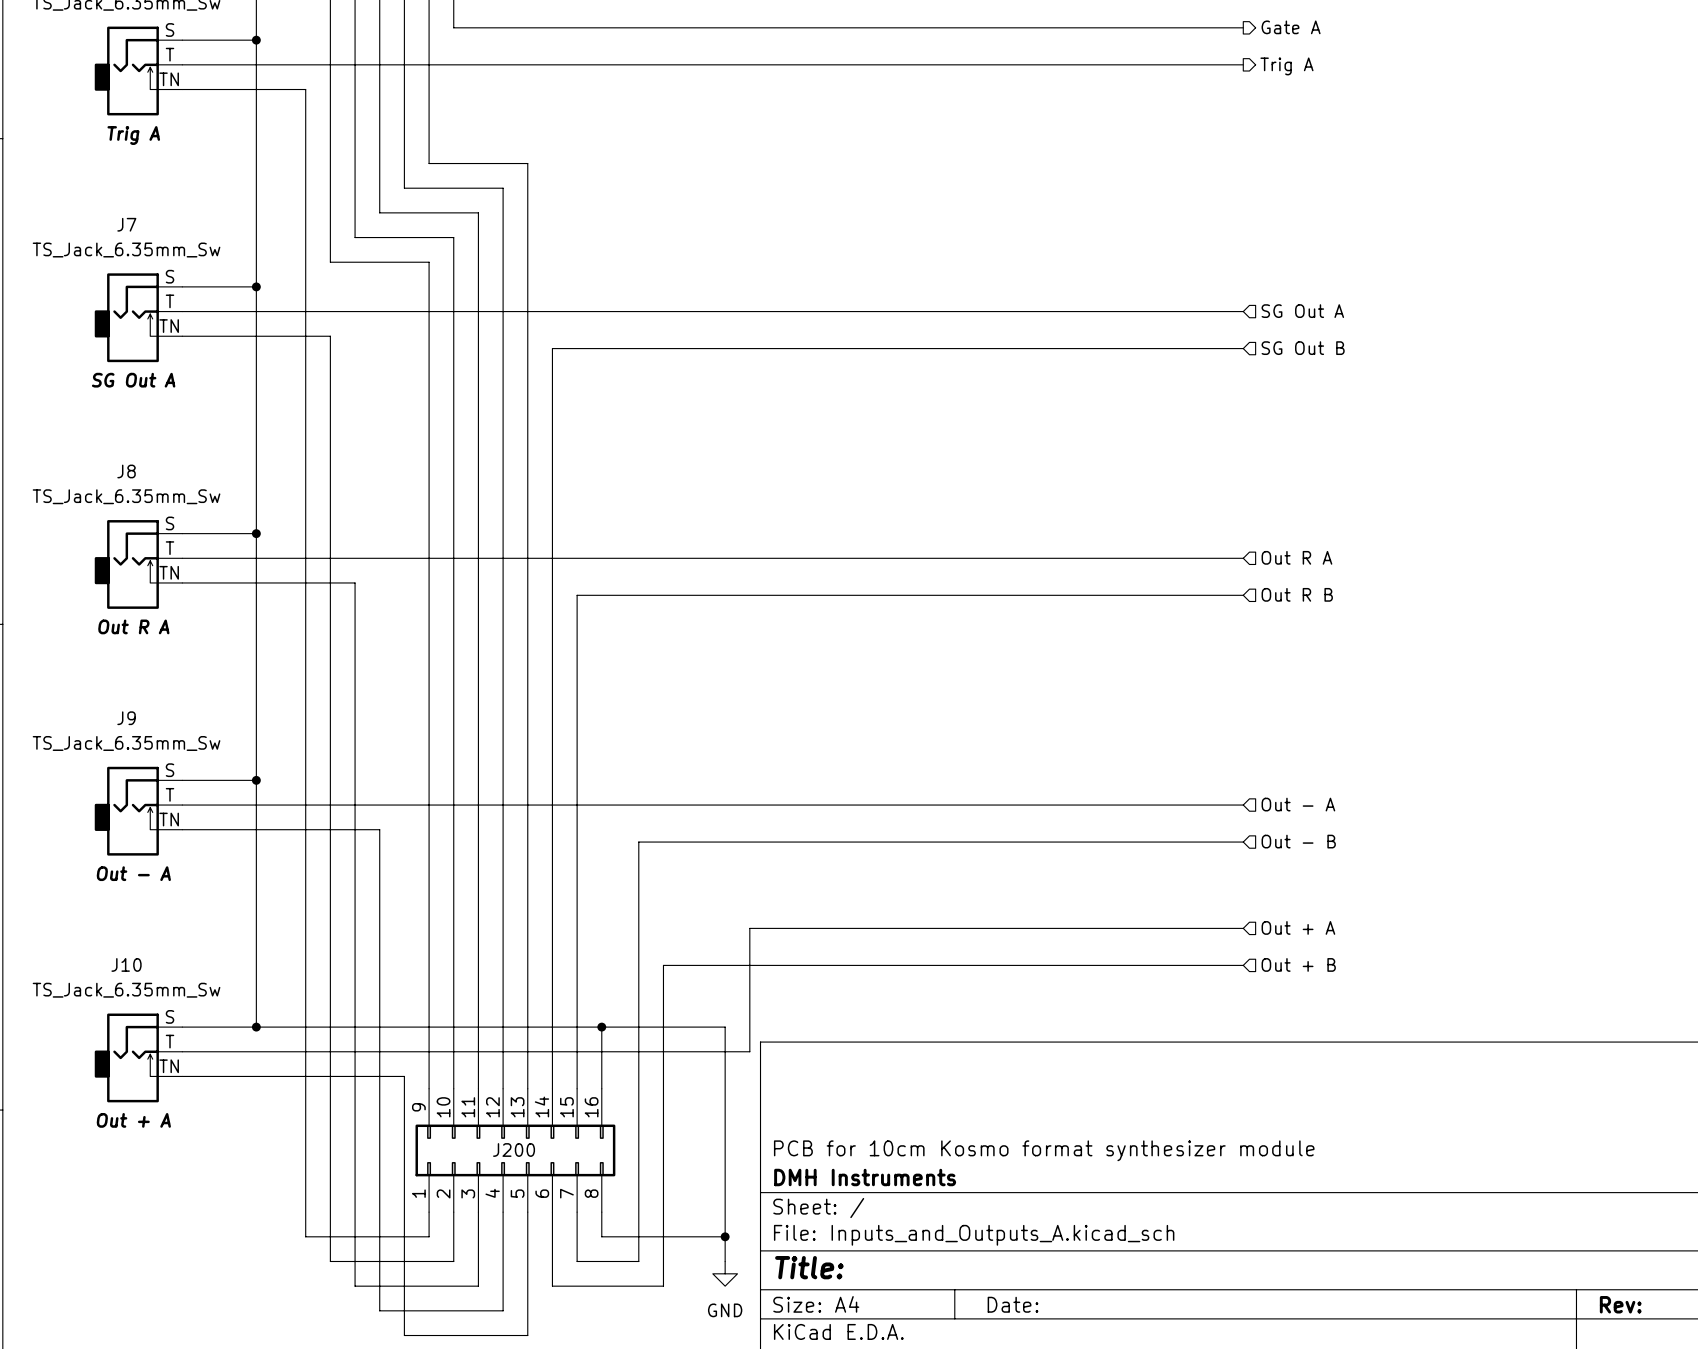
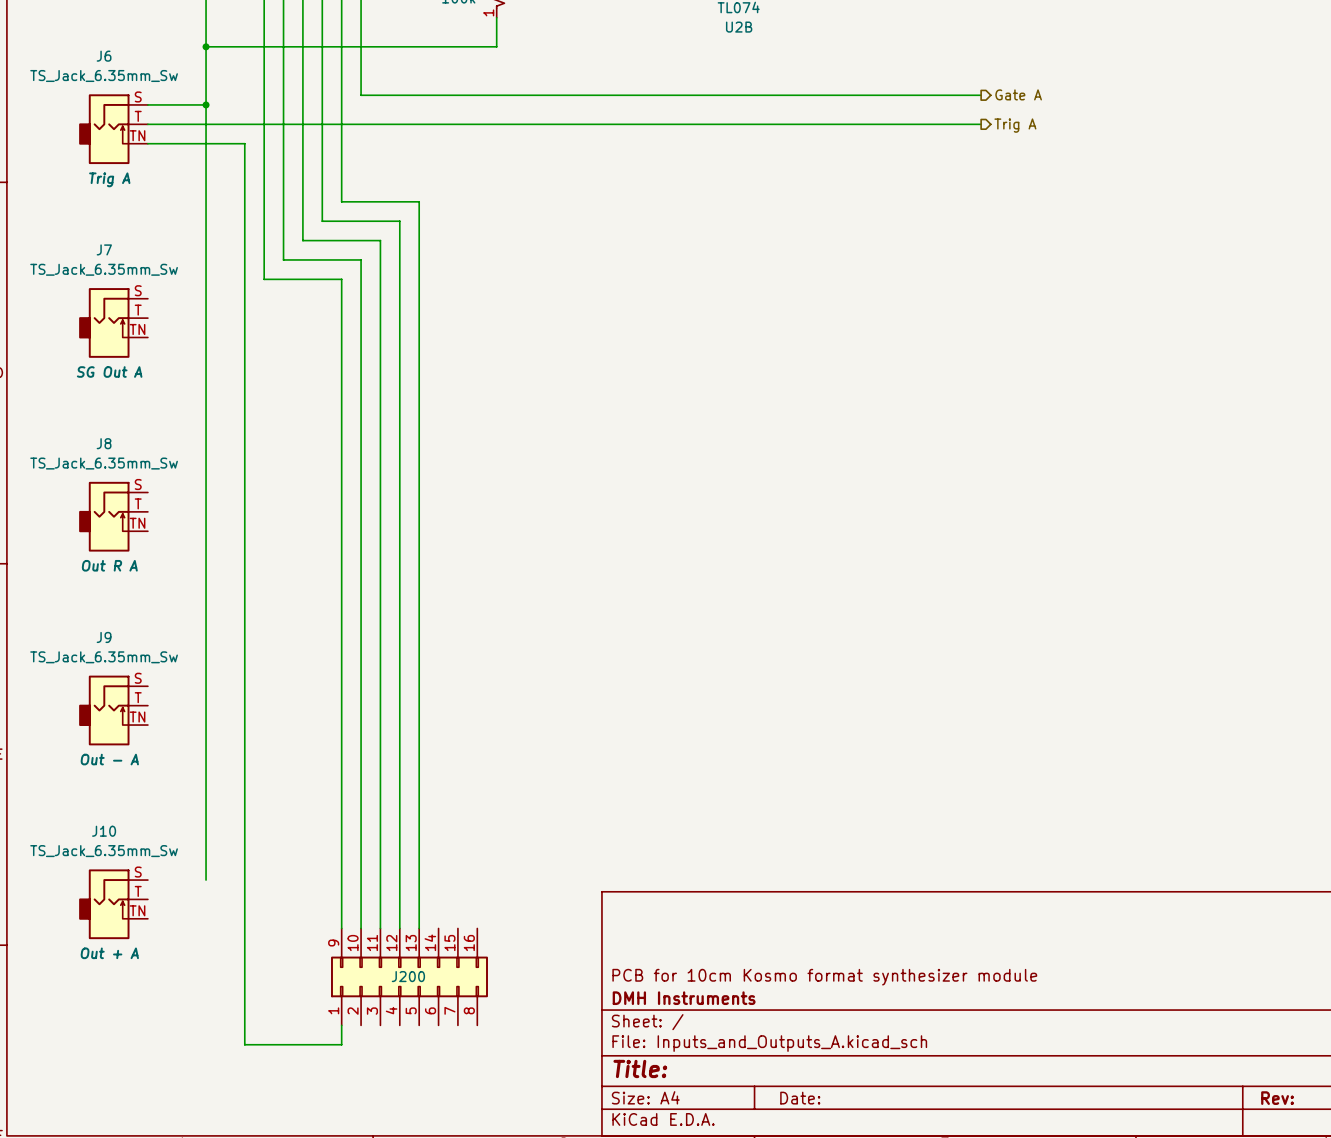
wire: (182, 286) (256, 286) -> none
junction: (256, 286) -> none
wire: (182, 311) (1243, 311) -> none
hierarchical label: SG Out A (1302, 311) -> none
wire: (182, 336) (330, 336) (330, 1261) (453, 1261) (453, 1212) -> none
wire: (1243, 348) (552, 348) (552, 1088) -> none
hierarchical label: SG Out B (1303, 348) -> none
wire: (182, 533) (256, 533) -> none
junction: (256, 533) -> none
hierarchical label: Out R A (1296, 557) -> none
wire: (182, 558) (1243, 558) -> none
wire: (182, 582) (355, 582) (355, 1286) (478, 1286) (478, 1212) -> none
hierarchical label: Out R B (1297, 594) -> none
wire: (1243, 595) (577, 595) (577, 1088) -> none
wire: (182, 780) (256, 780) -> none
junction: (256, 780) -> none
hierarchical label: Out - A (1298, 804) -> none
wire: (182, 805) (1243, 805) -> none
wire: (182, 829) (379, 829) (379, 1310) (503, 1310) (503, 1212) -> none
hierarchical label: Out - B (1298, 841) -> none
wire: (1243, 842) (638, 842) (638, 1261) (577, 1261) (577, 1212) -> none
hierarchical label: Out + A (1298, 927) -> none
wire: (1243, 928) (749, 928) (749, 1051) (182, 1051) -> none
hierarchical label: Out + B (1298, 964) -> none
wire: (1243, 965) (663, 965) (663, 1286) (552, 1286) (552, 1212) -> none
wire: (182, 1027) (725, 1027) (725, 1261) -> none
junction: (256, 1027) -> none
wire: (601, 1027) (601, 1088) -> none
junction: (601, 1027) -> none
wire: (182, 1076) (404, 1076) (404, 1335) (527, 1335) (527, 1212) -> none
wire: (601, 1212) (601, 1236) (725, 1236) -> none
junction: (725, 1236) -> none
power symbol: GND (725, 1273) -> none

